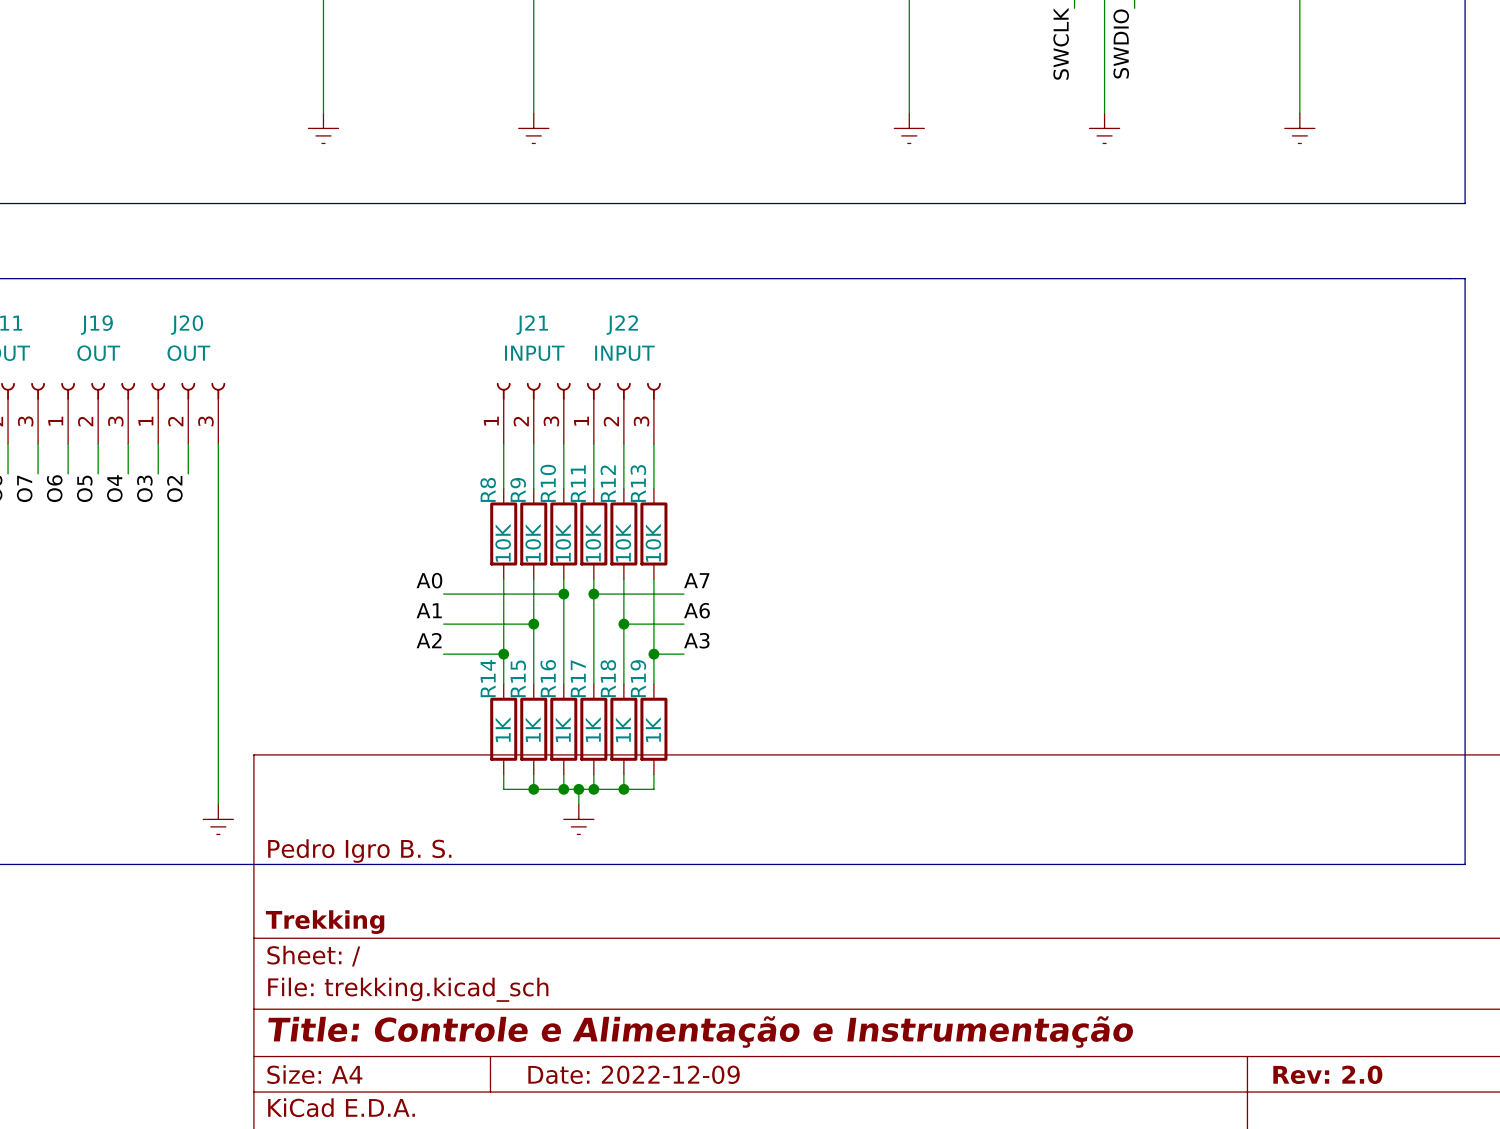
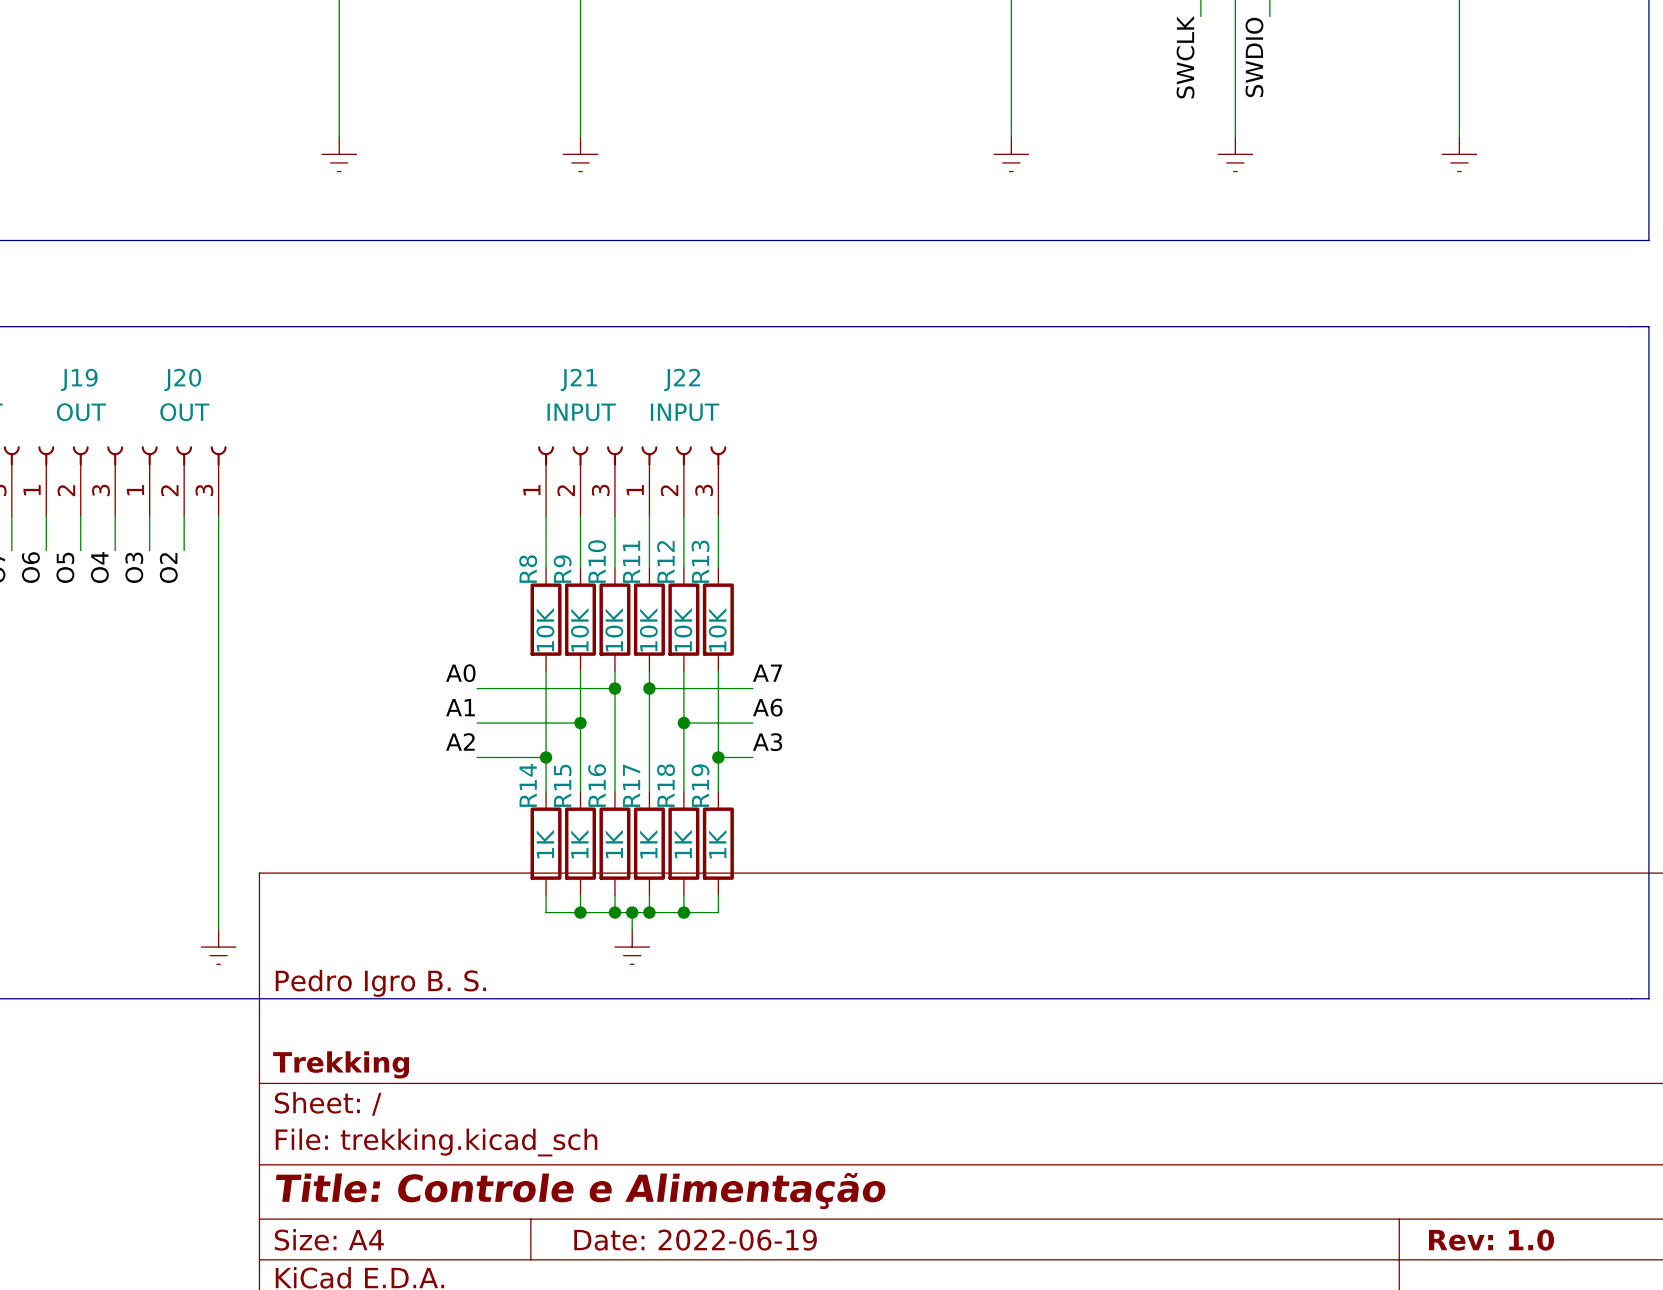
title block: Title: Controle e Alimentação e Instrumentação (700, 1032) -> Title: Controle e Alimentação (580, 1190)
title block: Date: 2022-12-09 (634, 1074) -> Date: 2022-06-19 (695, 1240)
title block: Rev: 2.0 (1327, 1074) -> Rev: 1.0 (1491, 1240)

